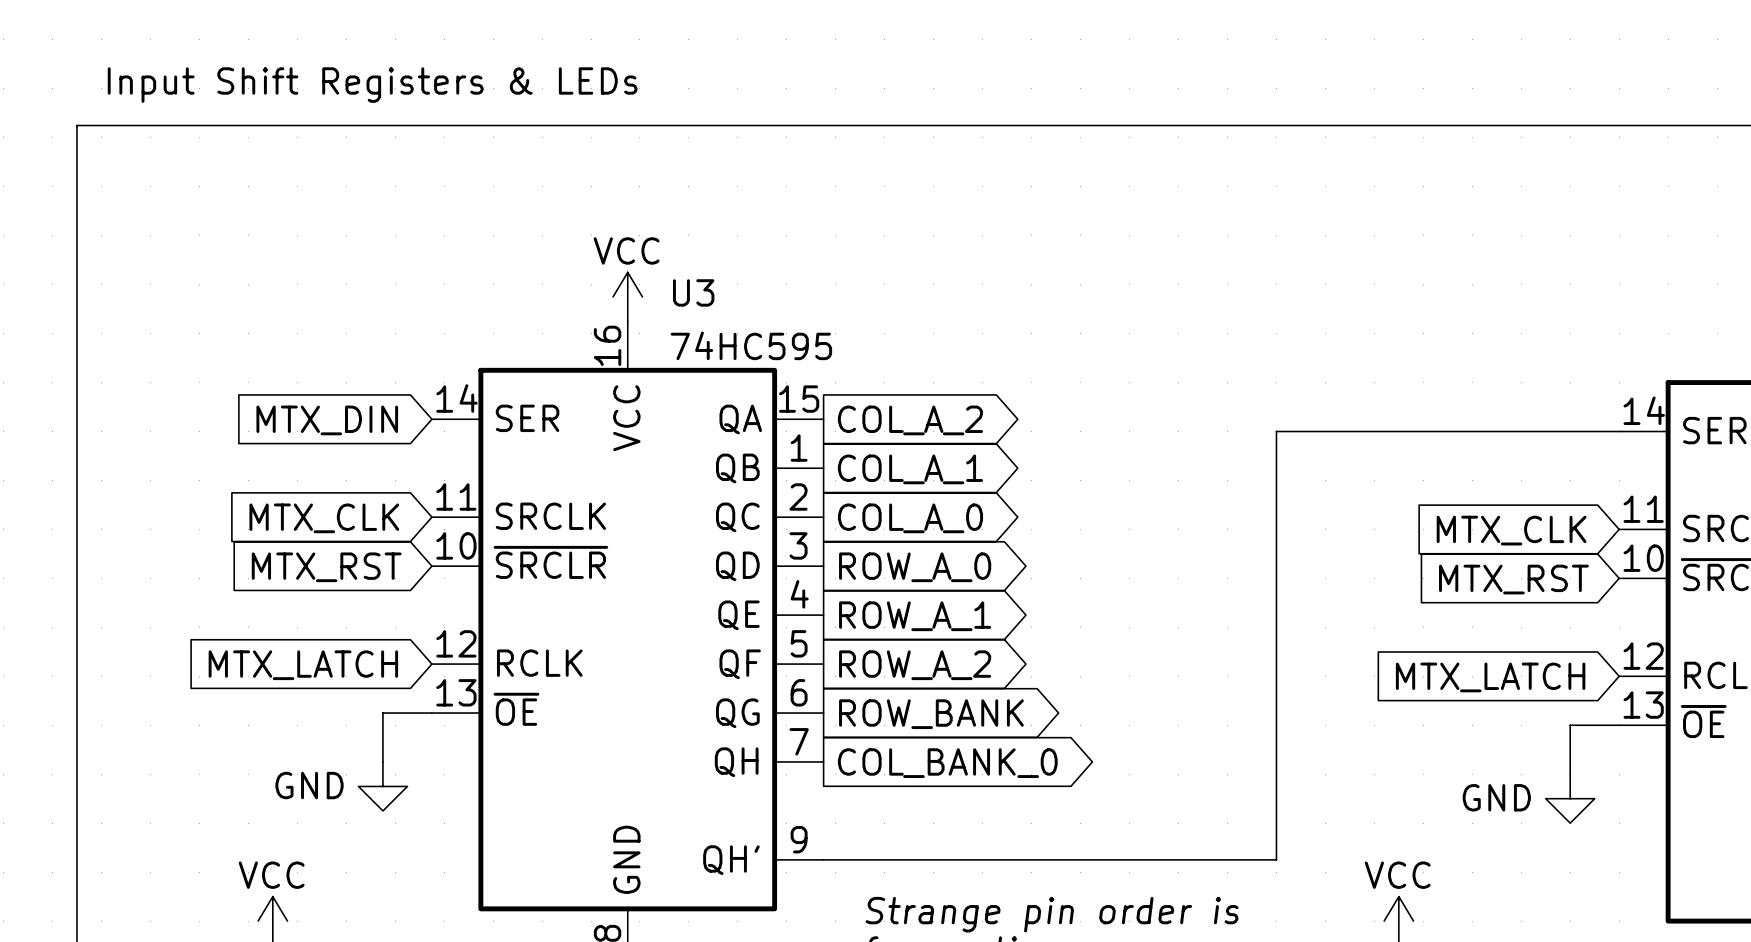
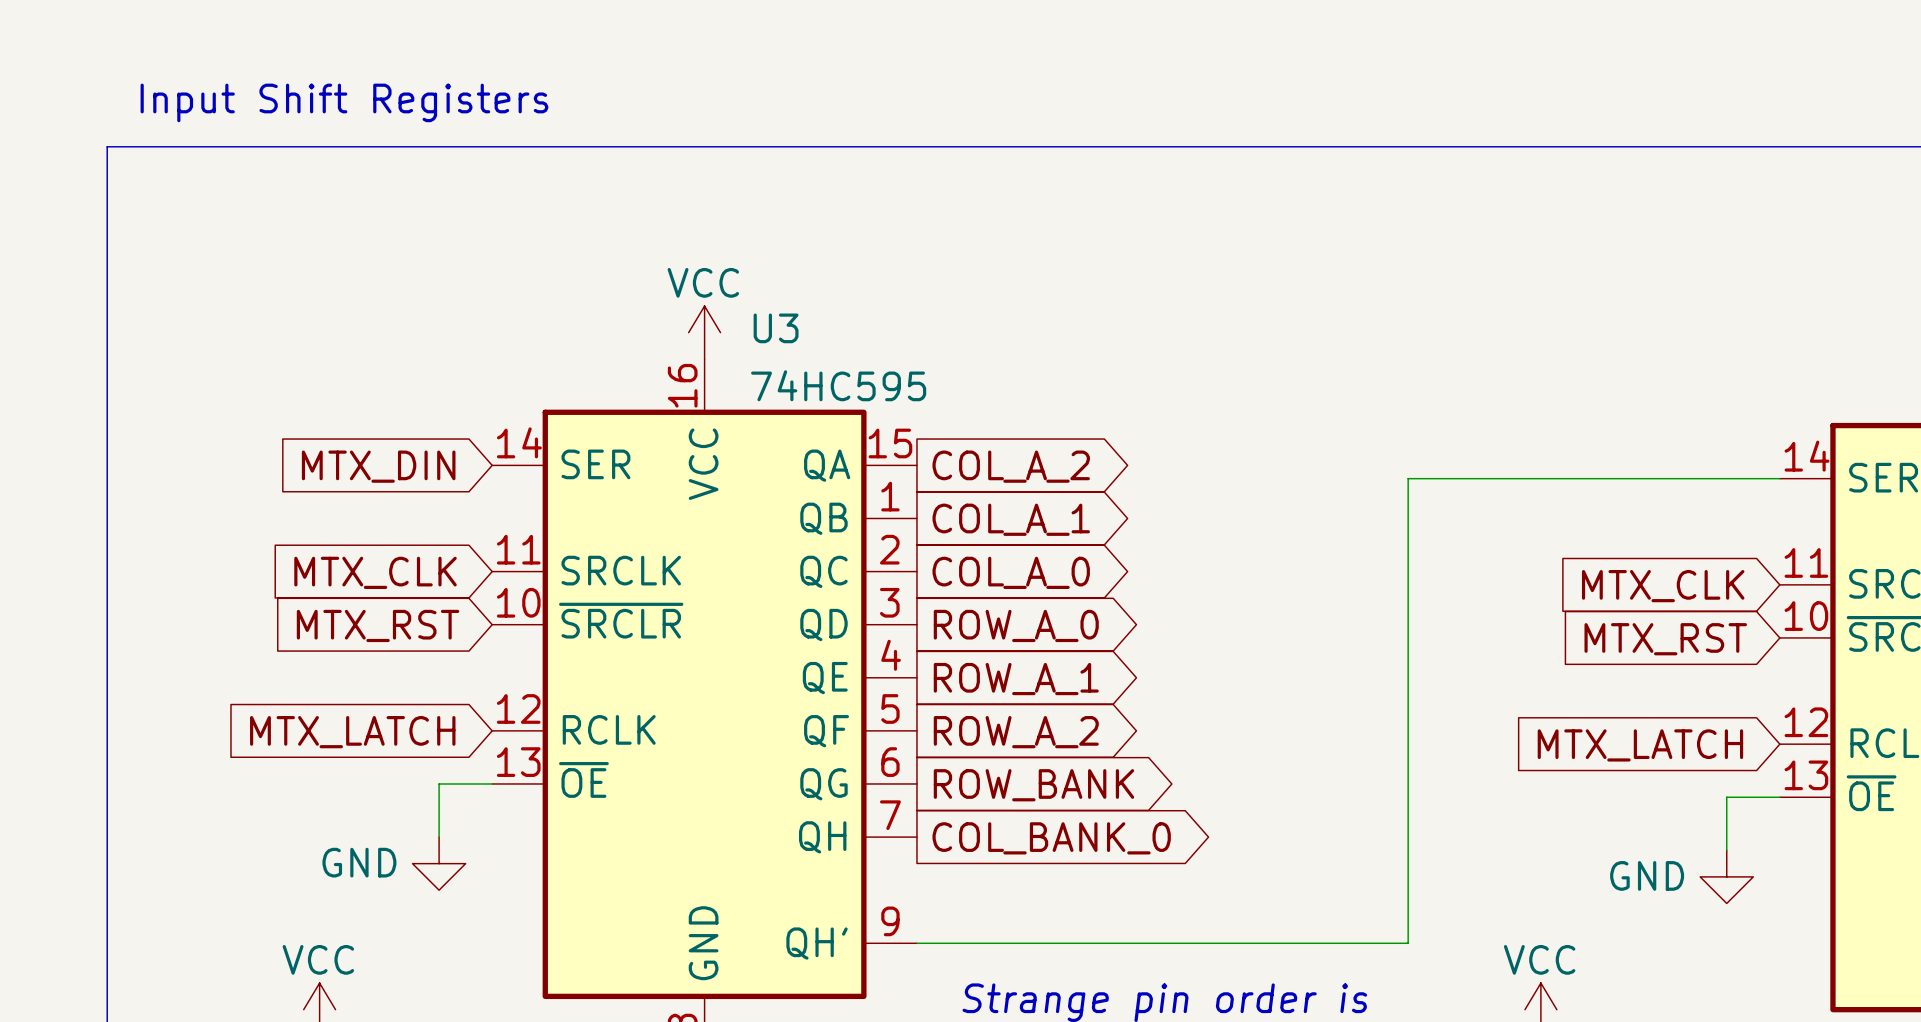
text: Input Shift Registers & LEDs (372, 85) -> Input Shift Registers (344, 102)

